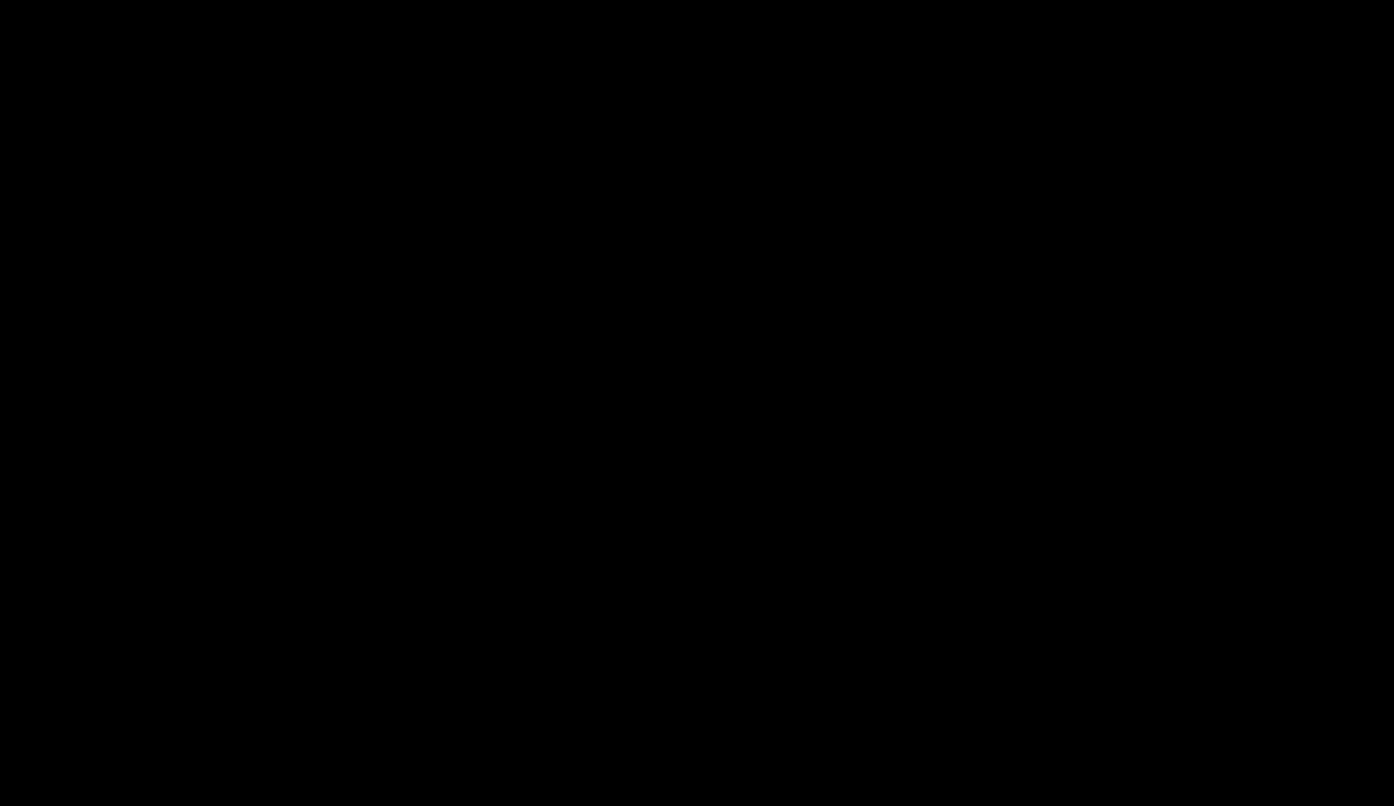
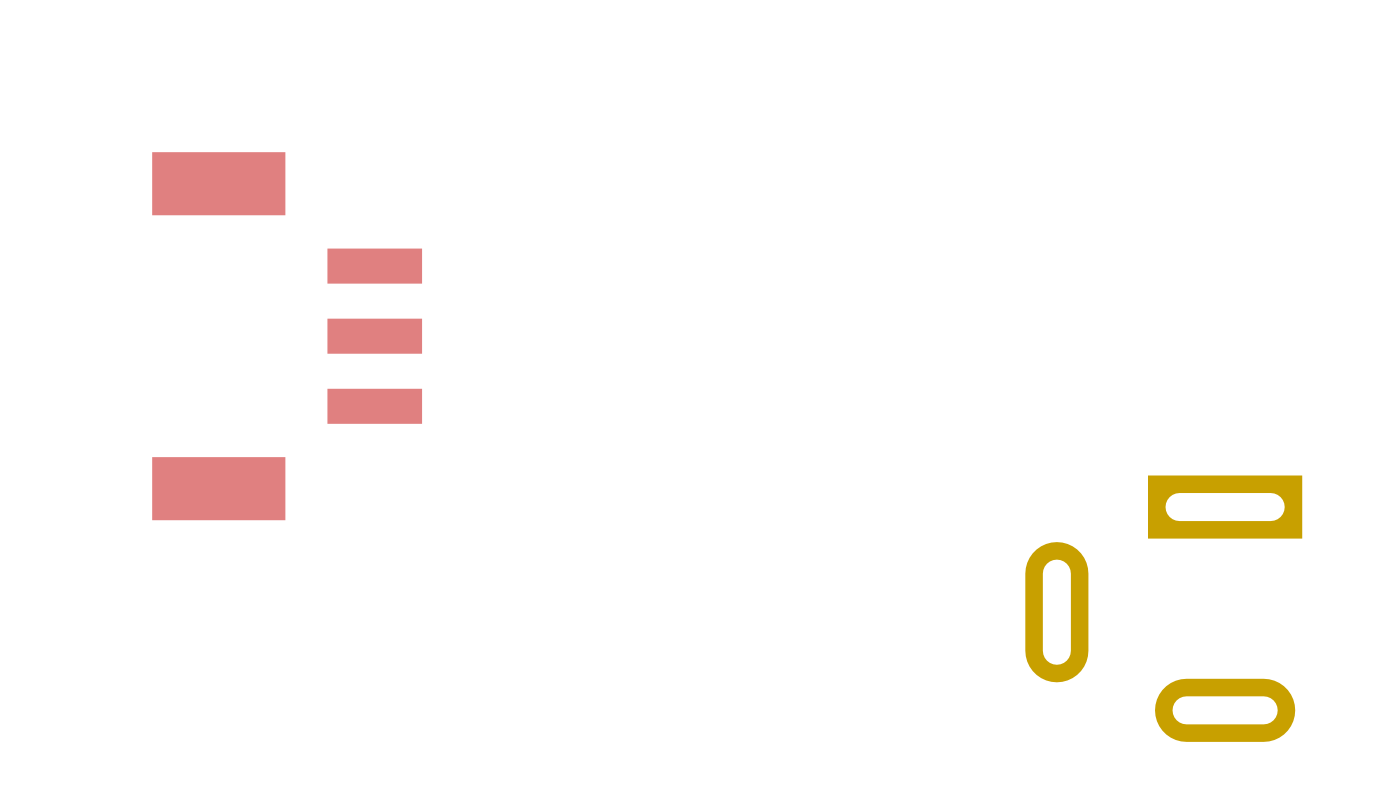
part: none -> (287, 336)
part: none -> (1163, 608)

